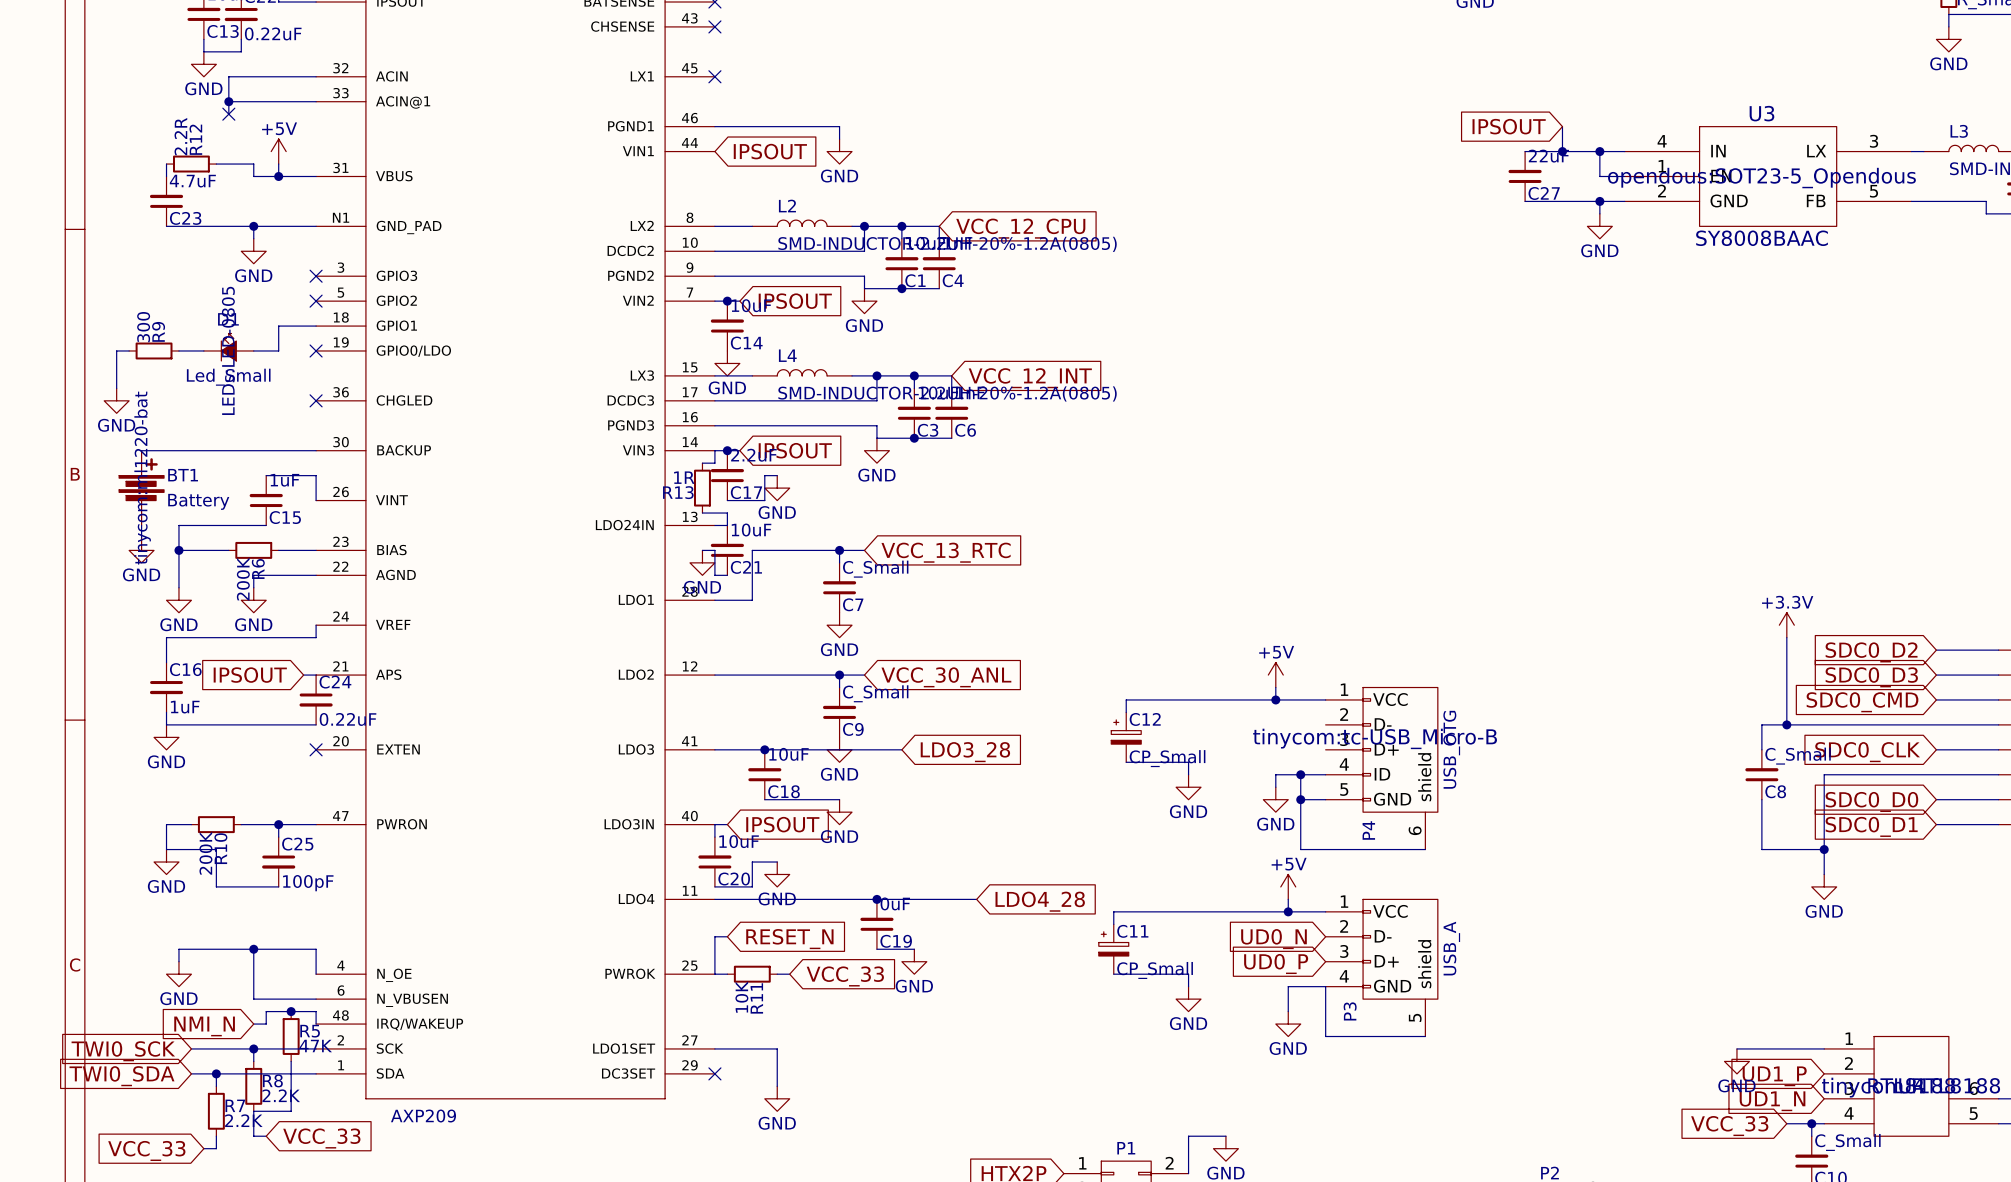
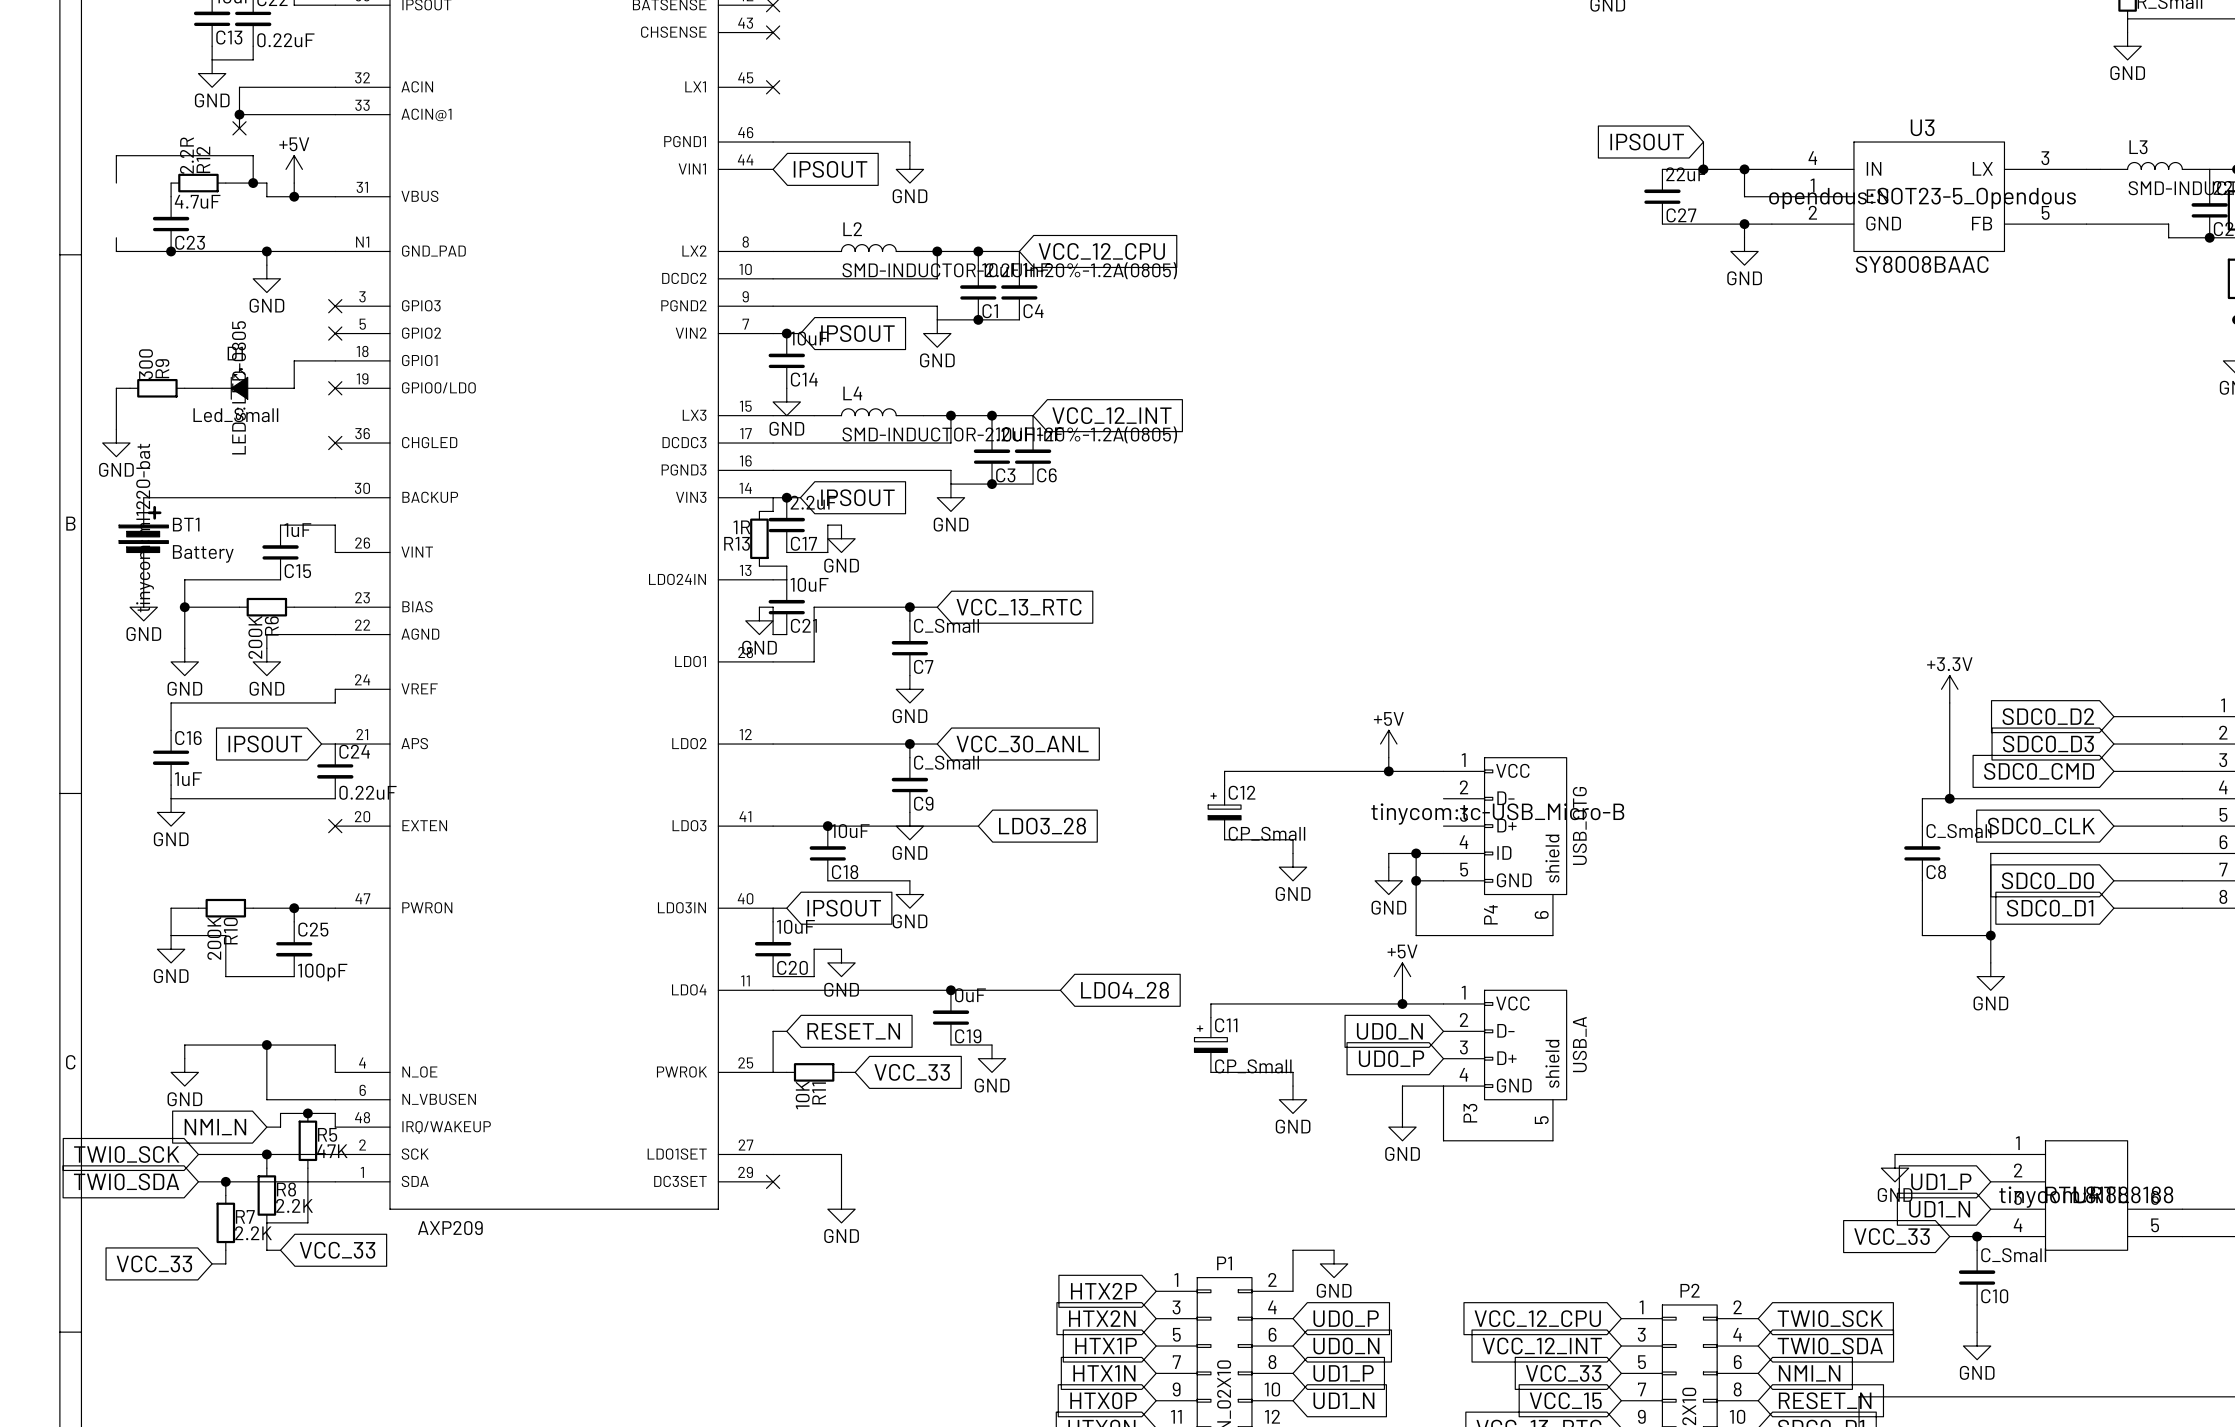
wire: none -> (116, 183) (116, 155) (253, 155) (253, 183)
junction: none -> (253, 183)
wire: none -> (116, 237) (116, 251) (171, 251)
junction: none -> (171, 251)

